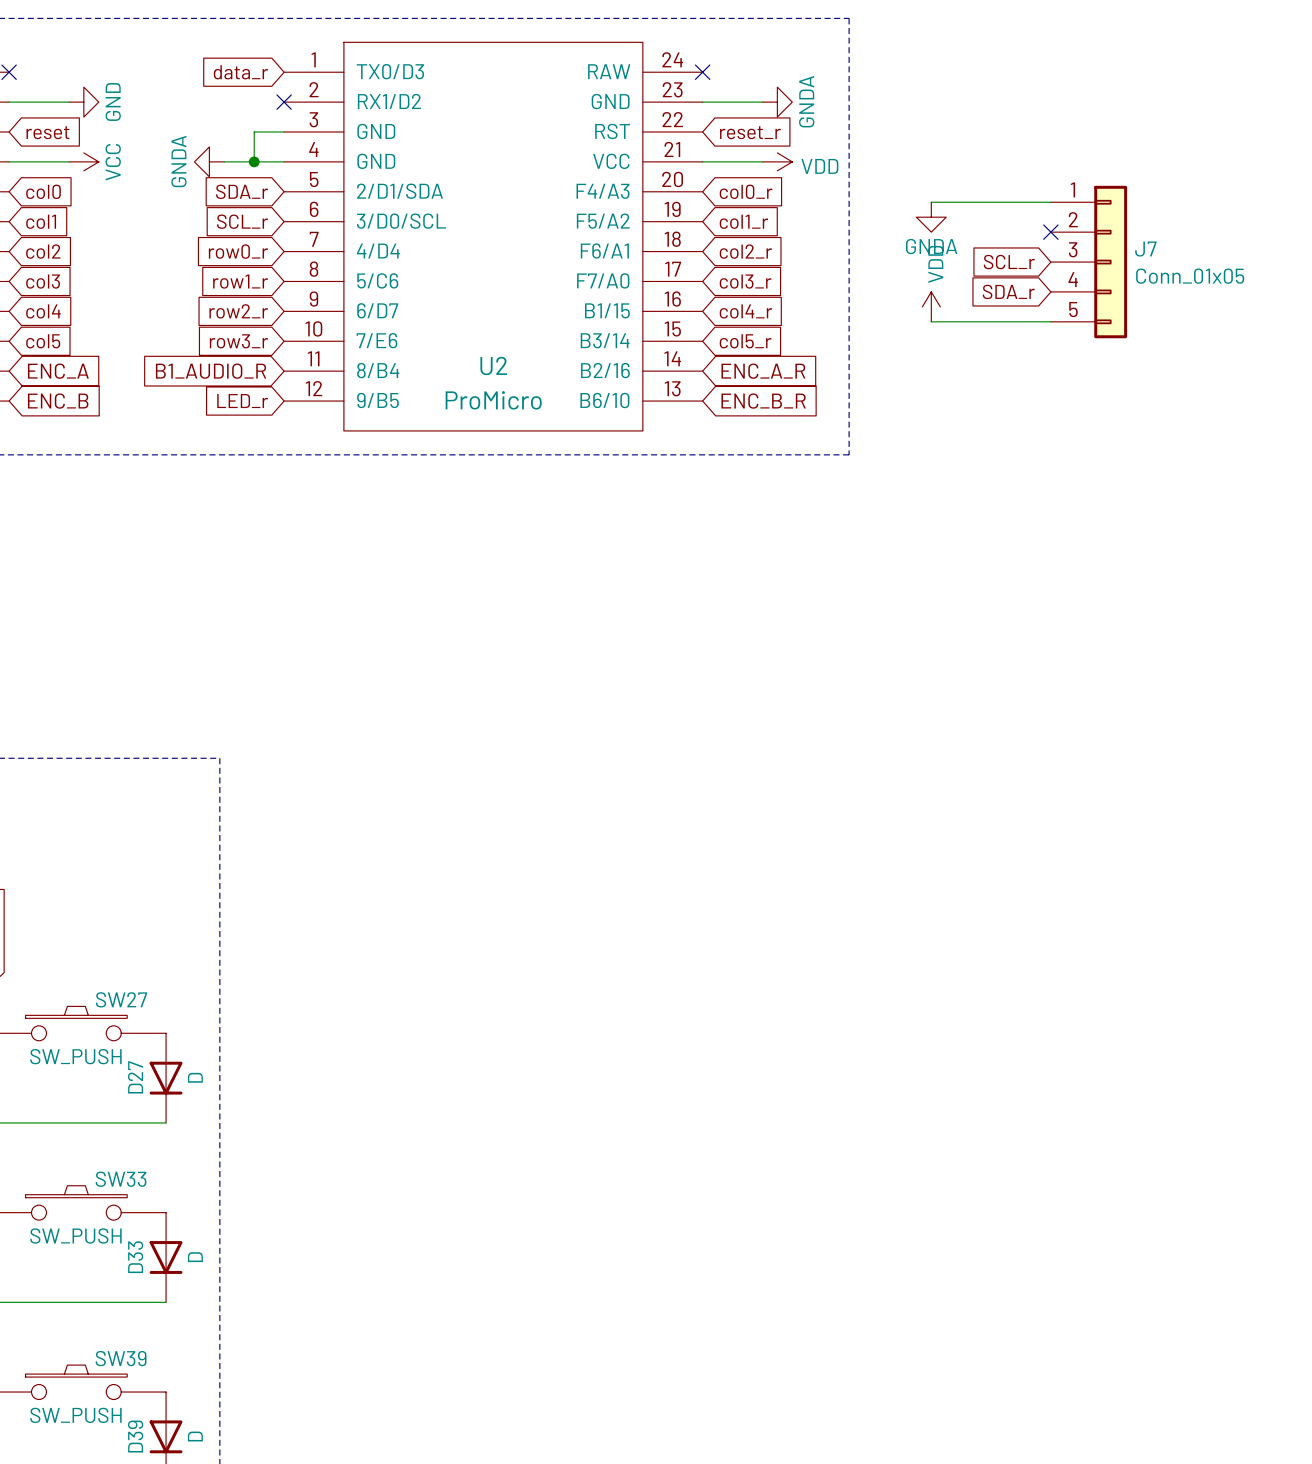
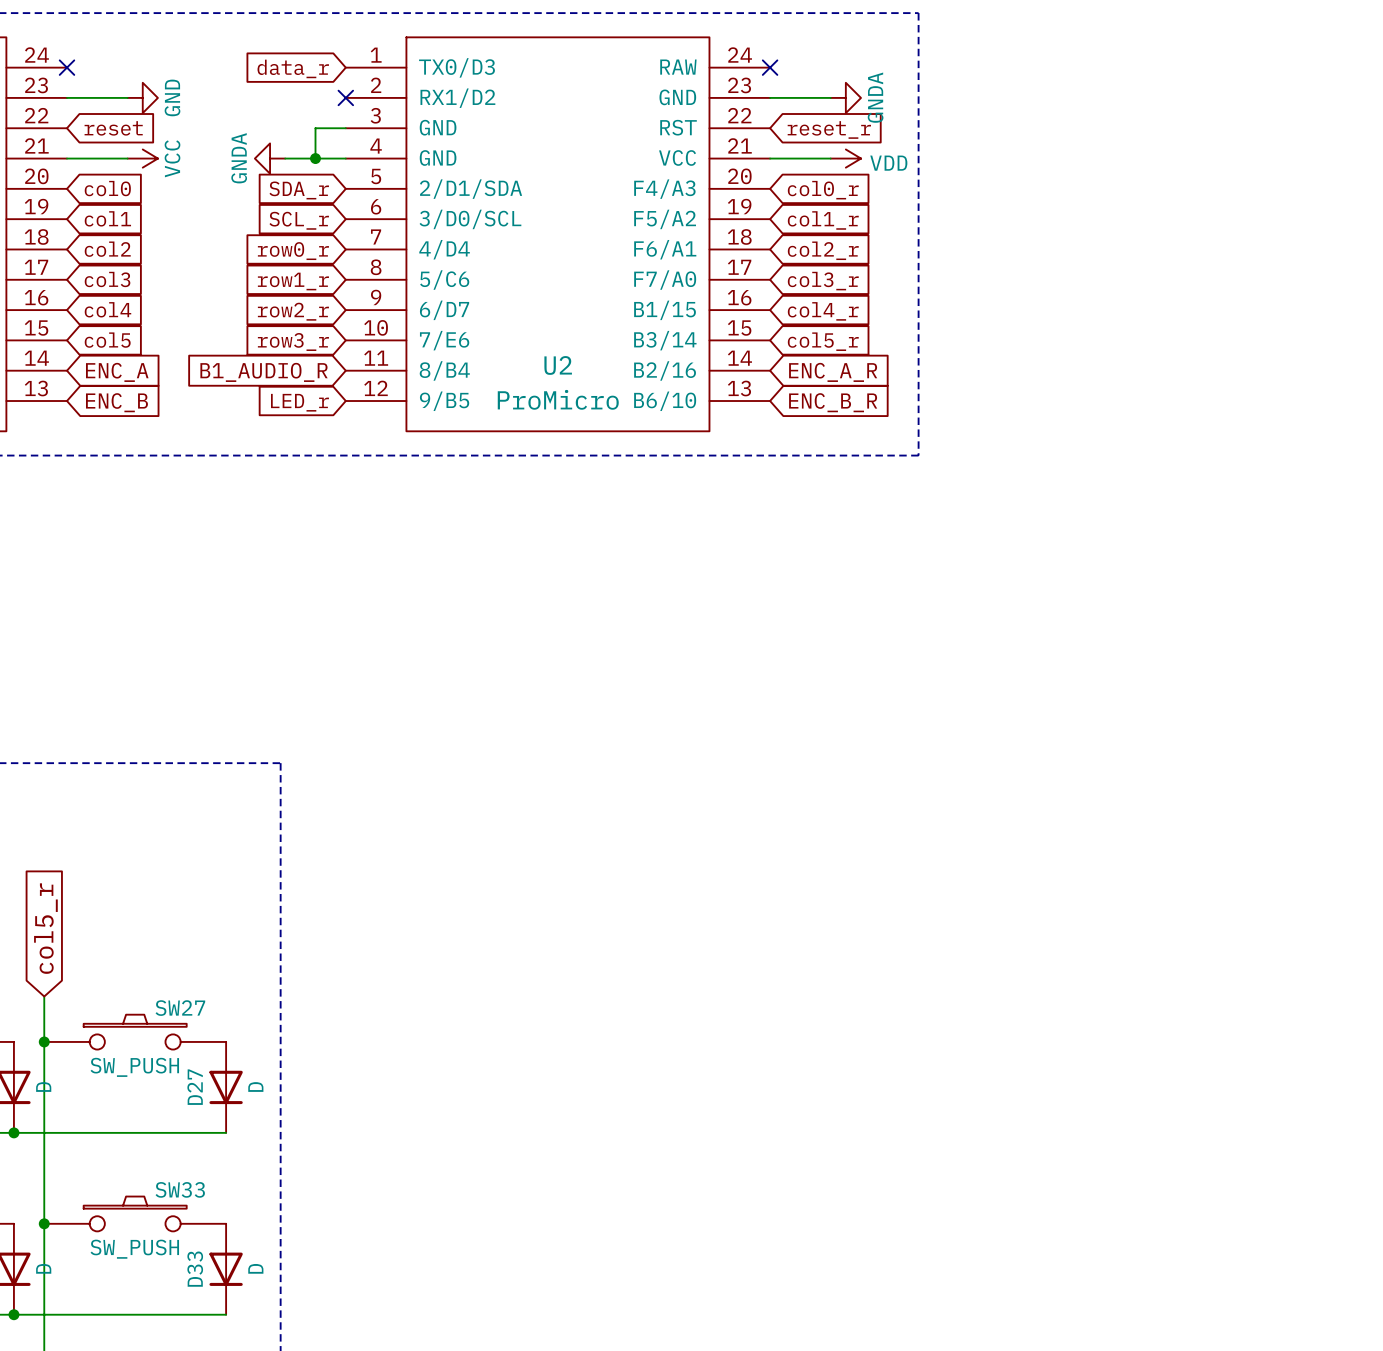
wire: (931, 202) (1050, 202) -> none
power symbol: GNDA (931, 217) -> none
no-connect mark: (1050, 232) -> none
global label: SCL_r (1009, 262) -> none
J7: Conn_01x05 (1089, 262) -> none
global label: SDA_r (1008, 291) -> none
power symbol: VDD (931, 306) -> none
wire: (931, 321) (1050, 321) -> none

